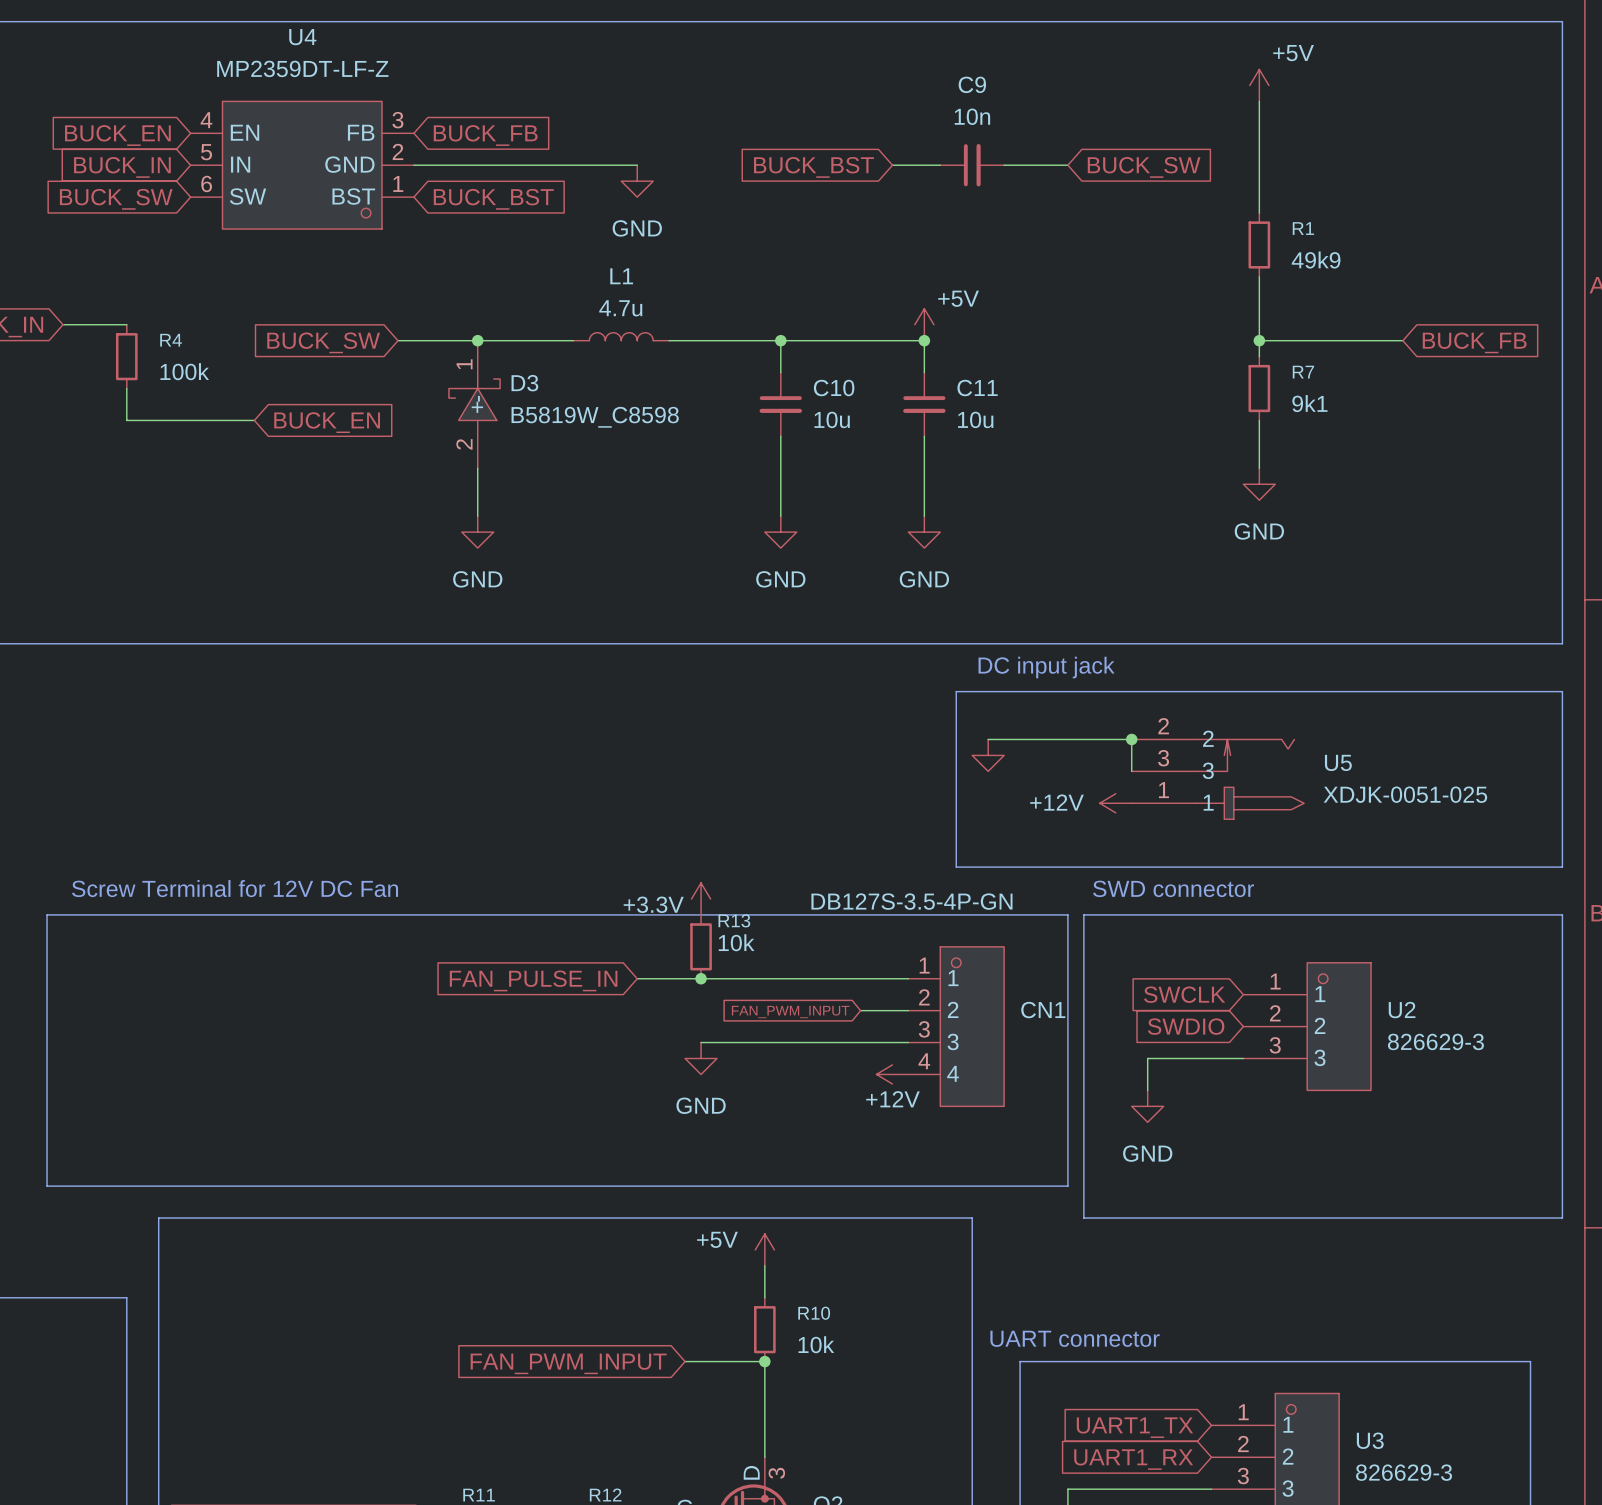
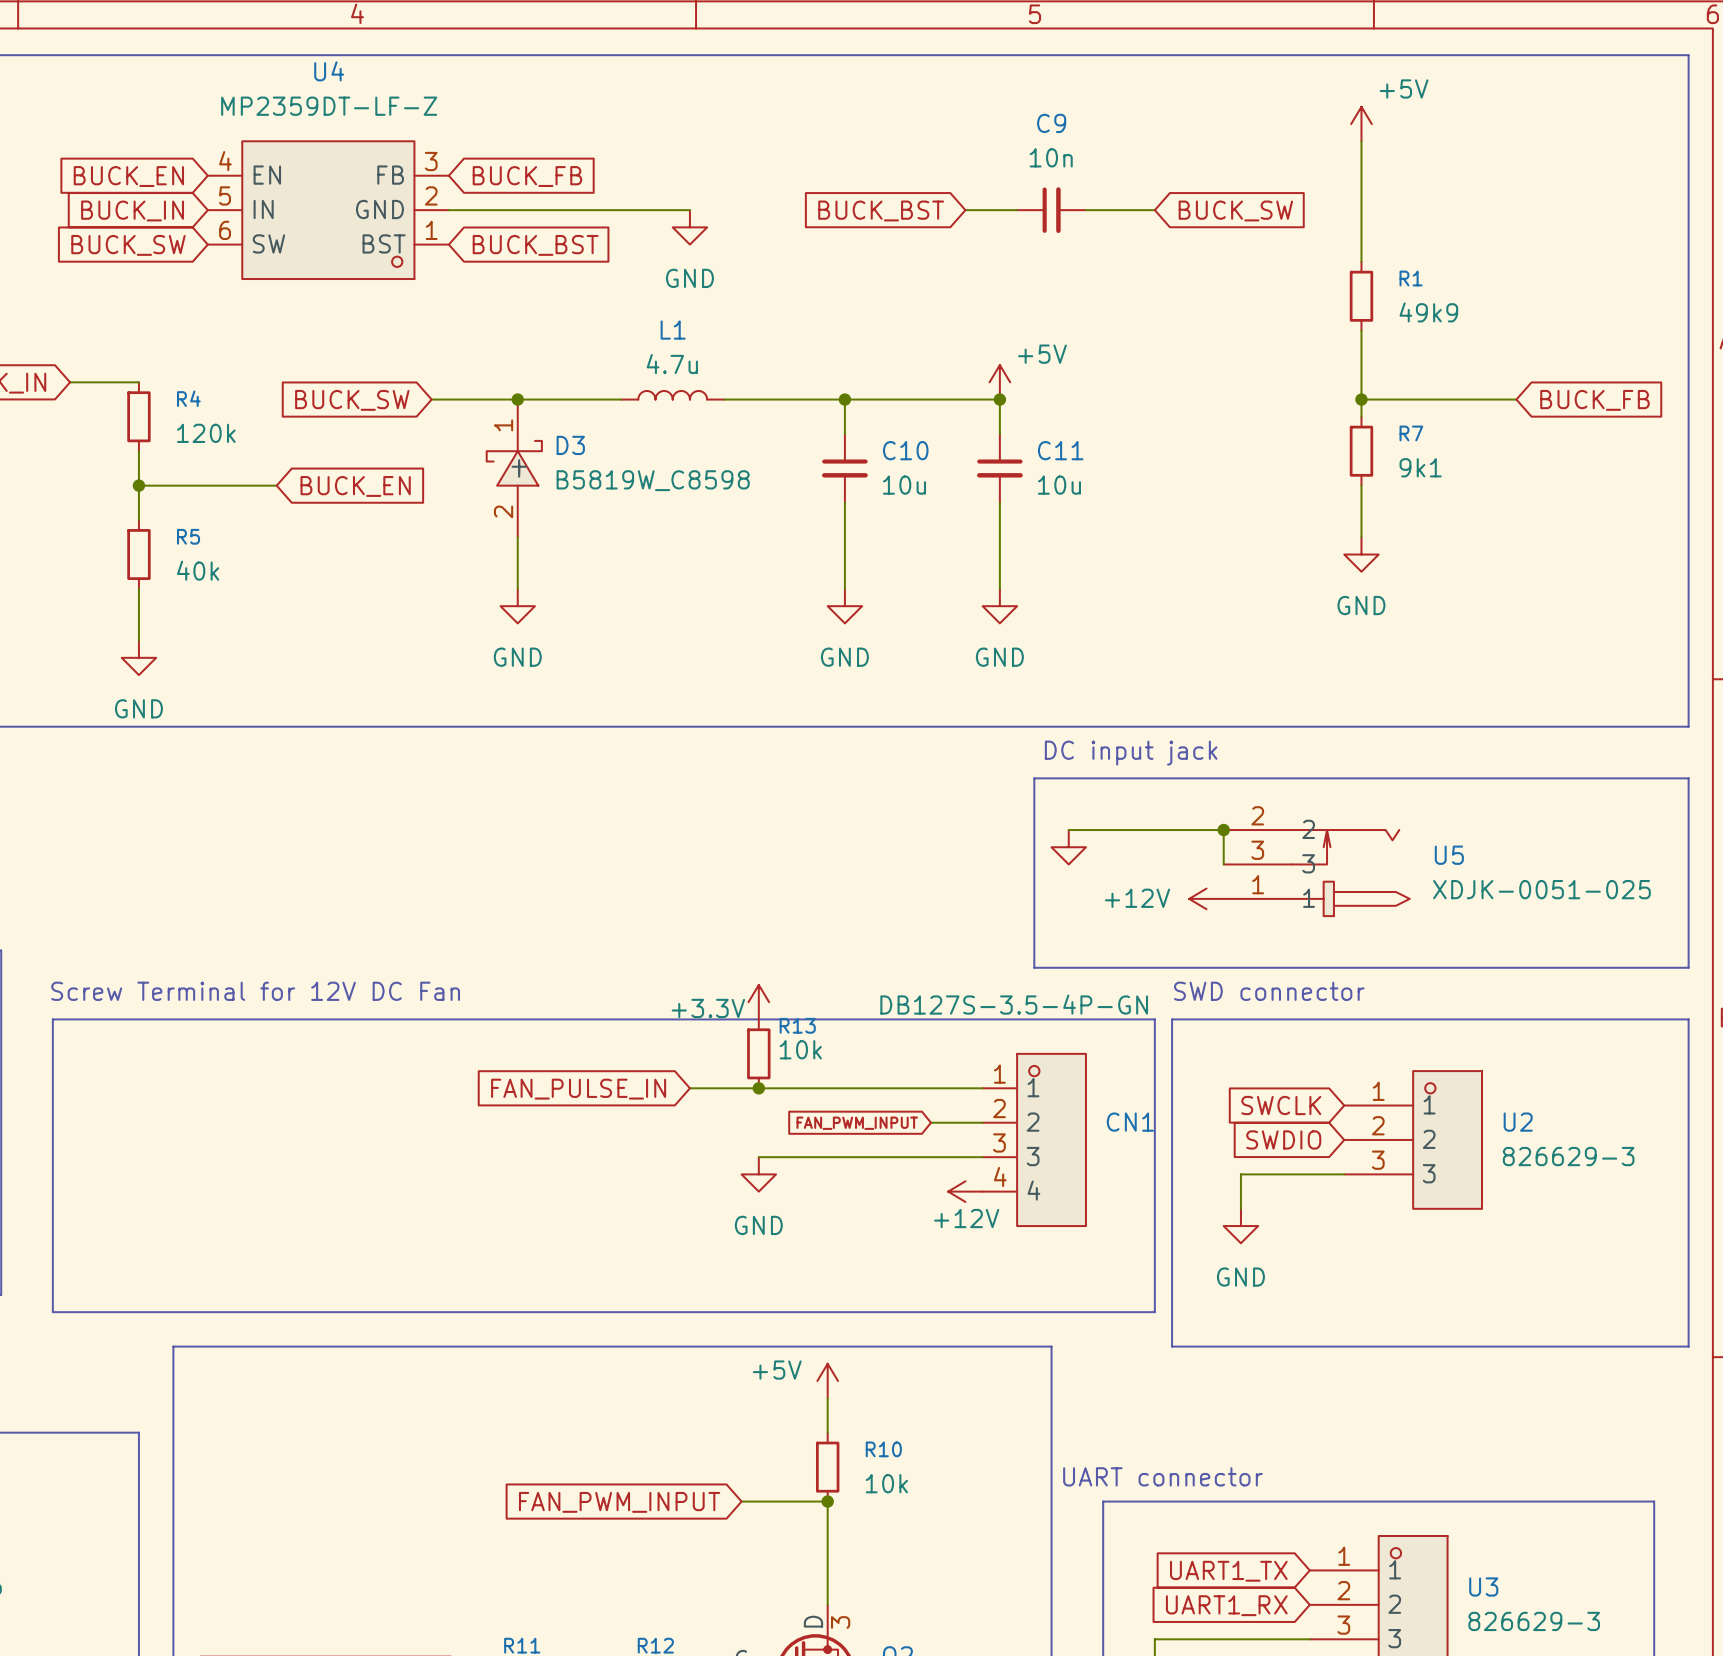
R4 value: 100k (184, 371) -> 120k (206, 433)
wire: none -> (138, 485) (138, 520)
junction: none -> (138, 485)
R5: none -> 40k (138, 554)
wire: none -> (138, 588) (138, 640)
power symbol: none -> GND (138, 657)

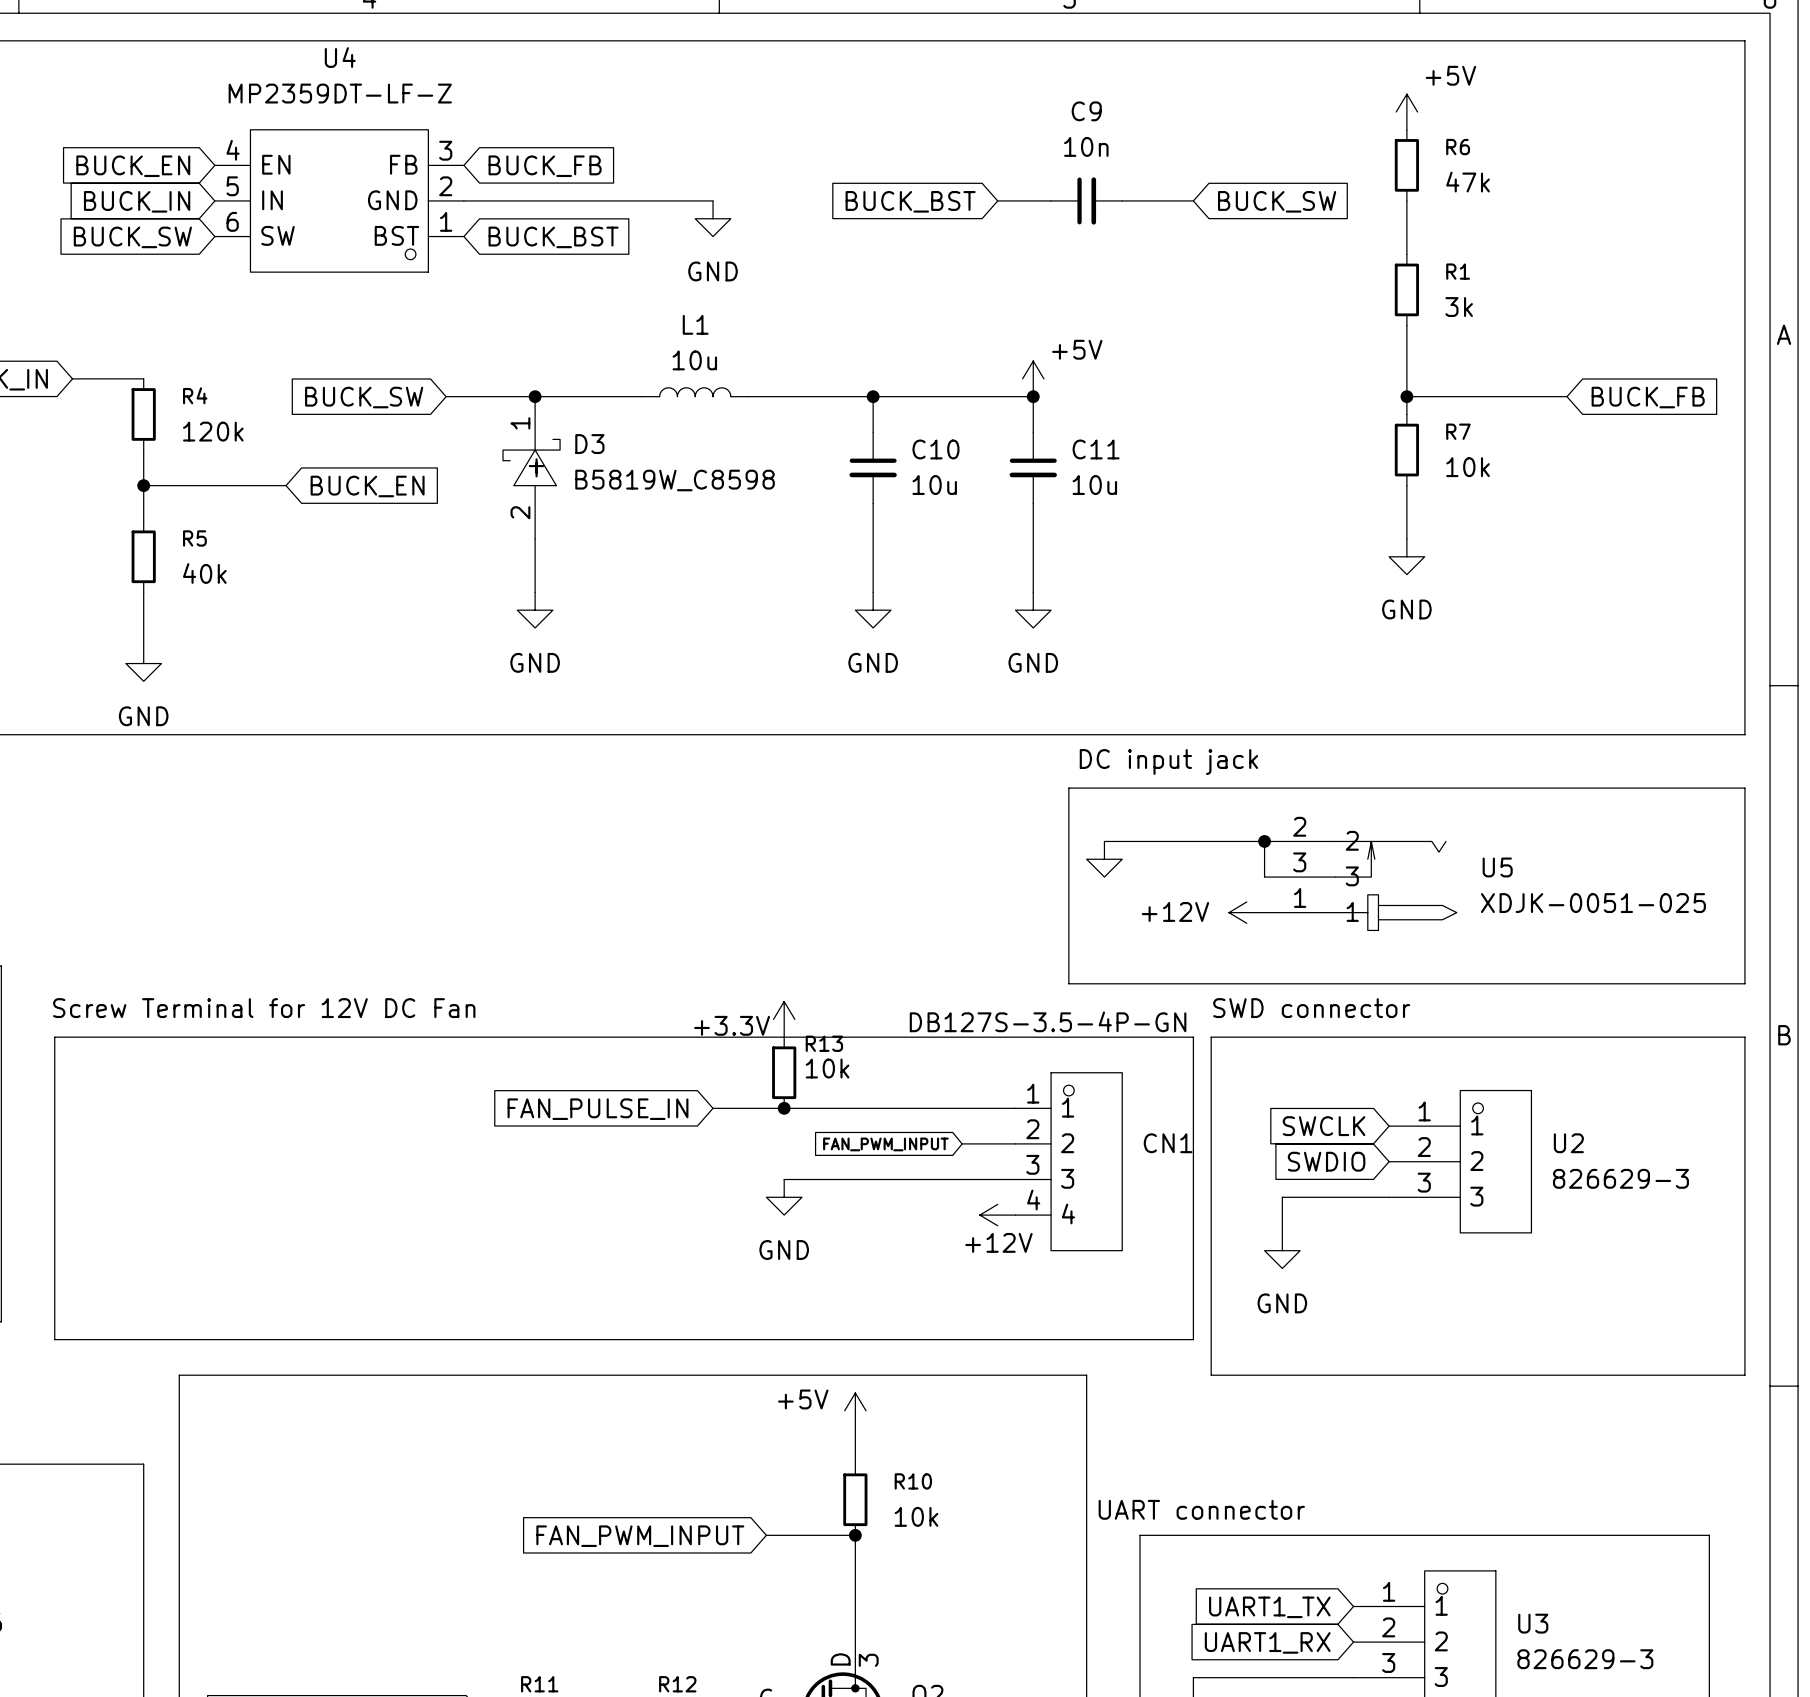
wire: (1361, 141) (1361, 210) -> none
R6: none -> 47k (1406, 165)
R1 value: 49k9 (1428, 312) -> 3k (1459, 307)
L1 value: 4.7u (672, 364) -> 10u (694, 360)
R7 value: 9k1 (1420, 467) -> 10k (1468, 467)

